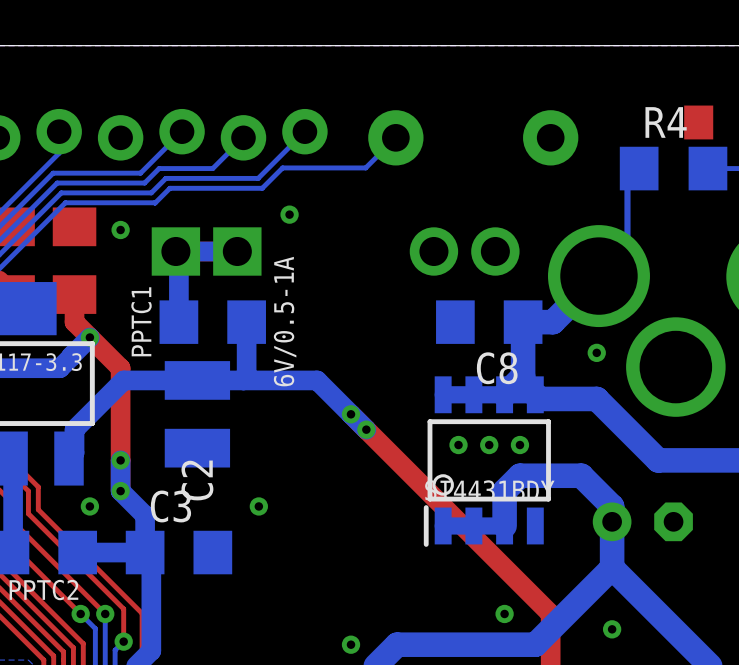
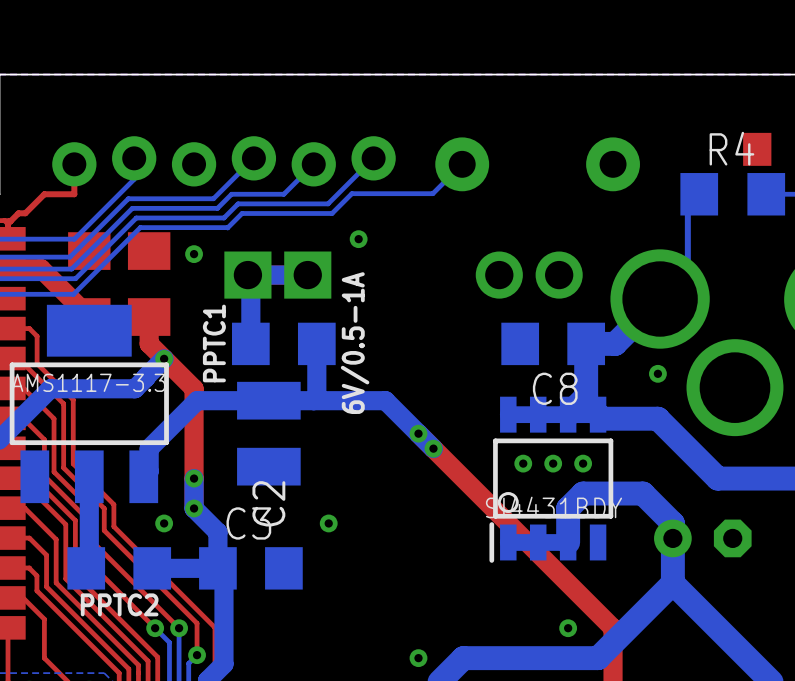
via: (612, 629) -> none

